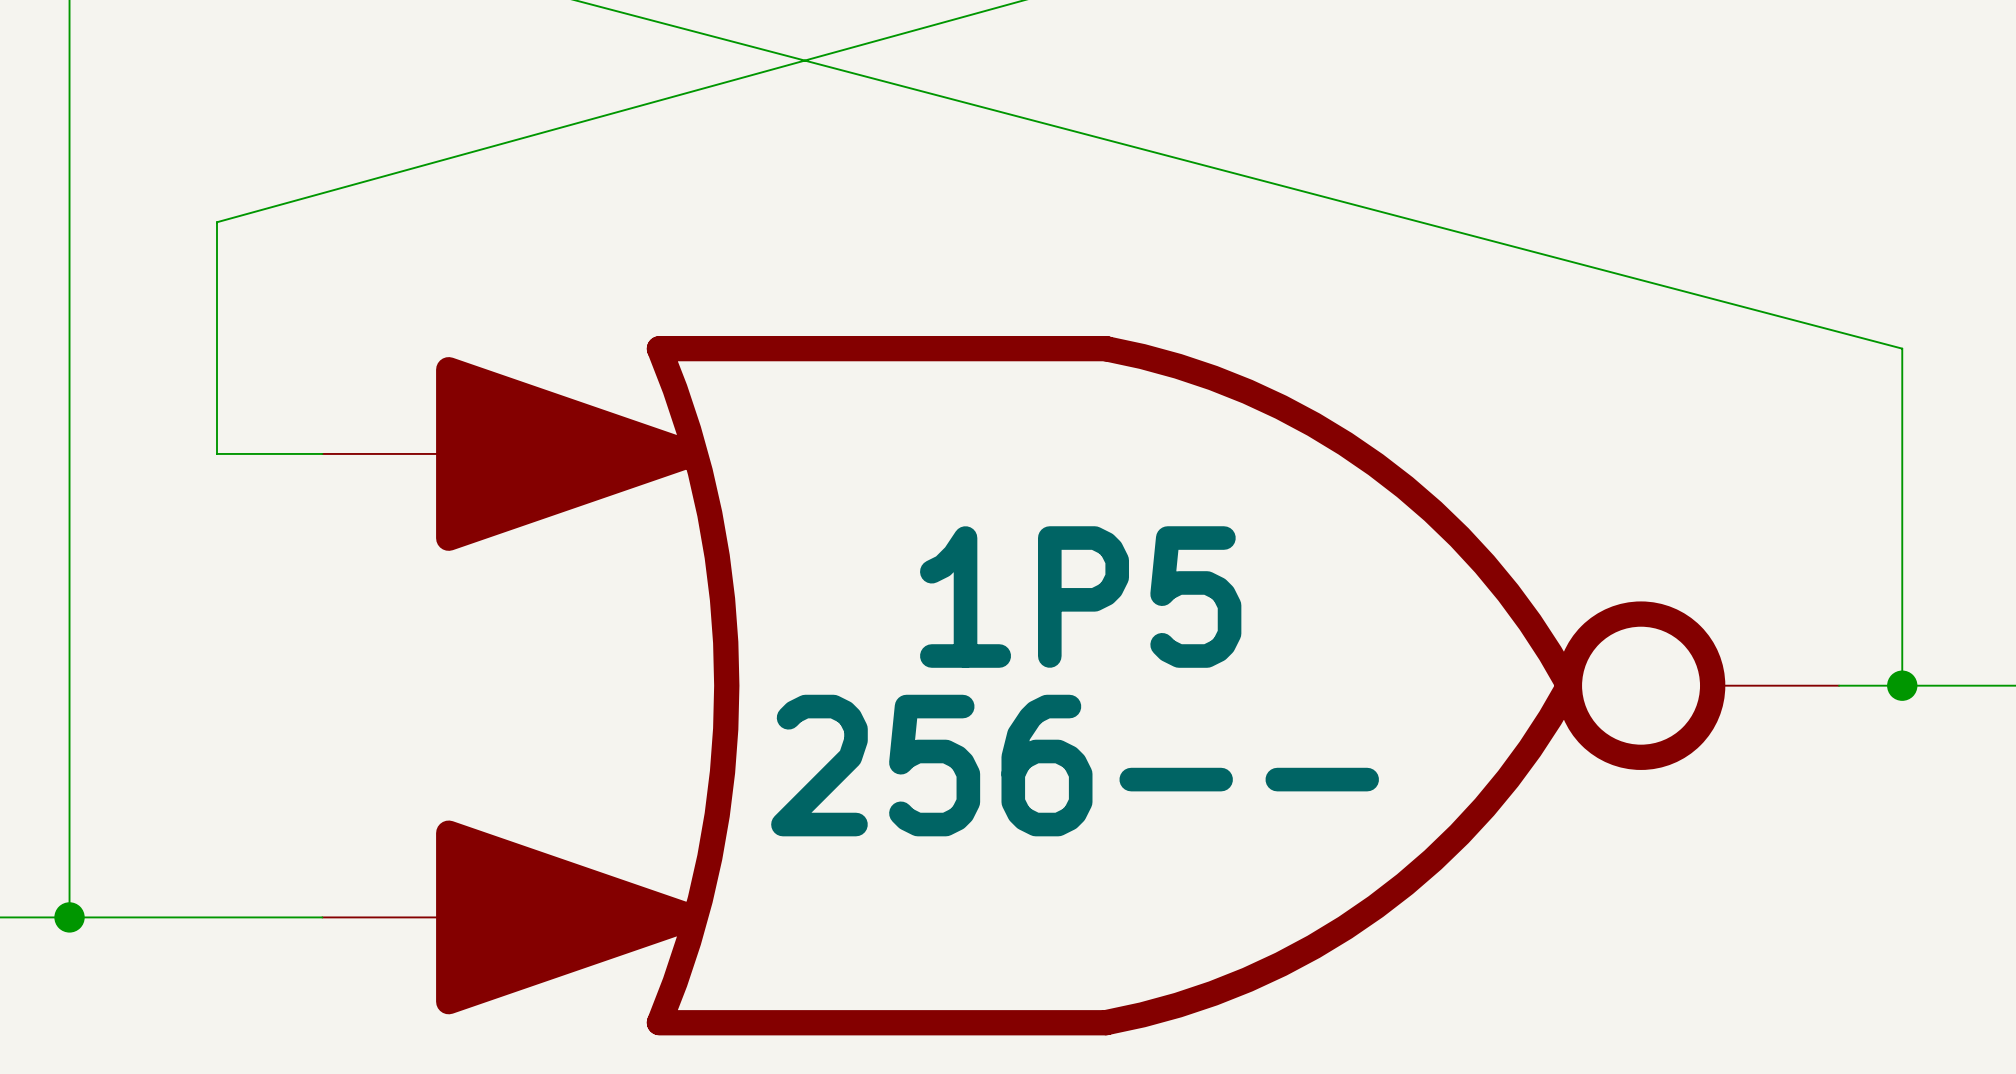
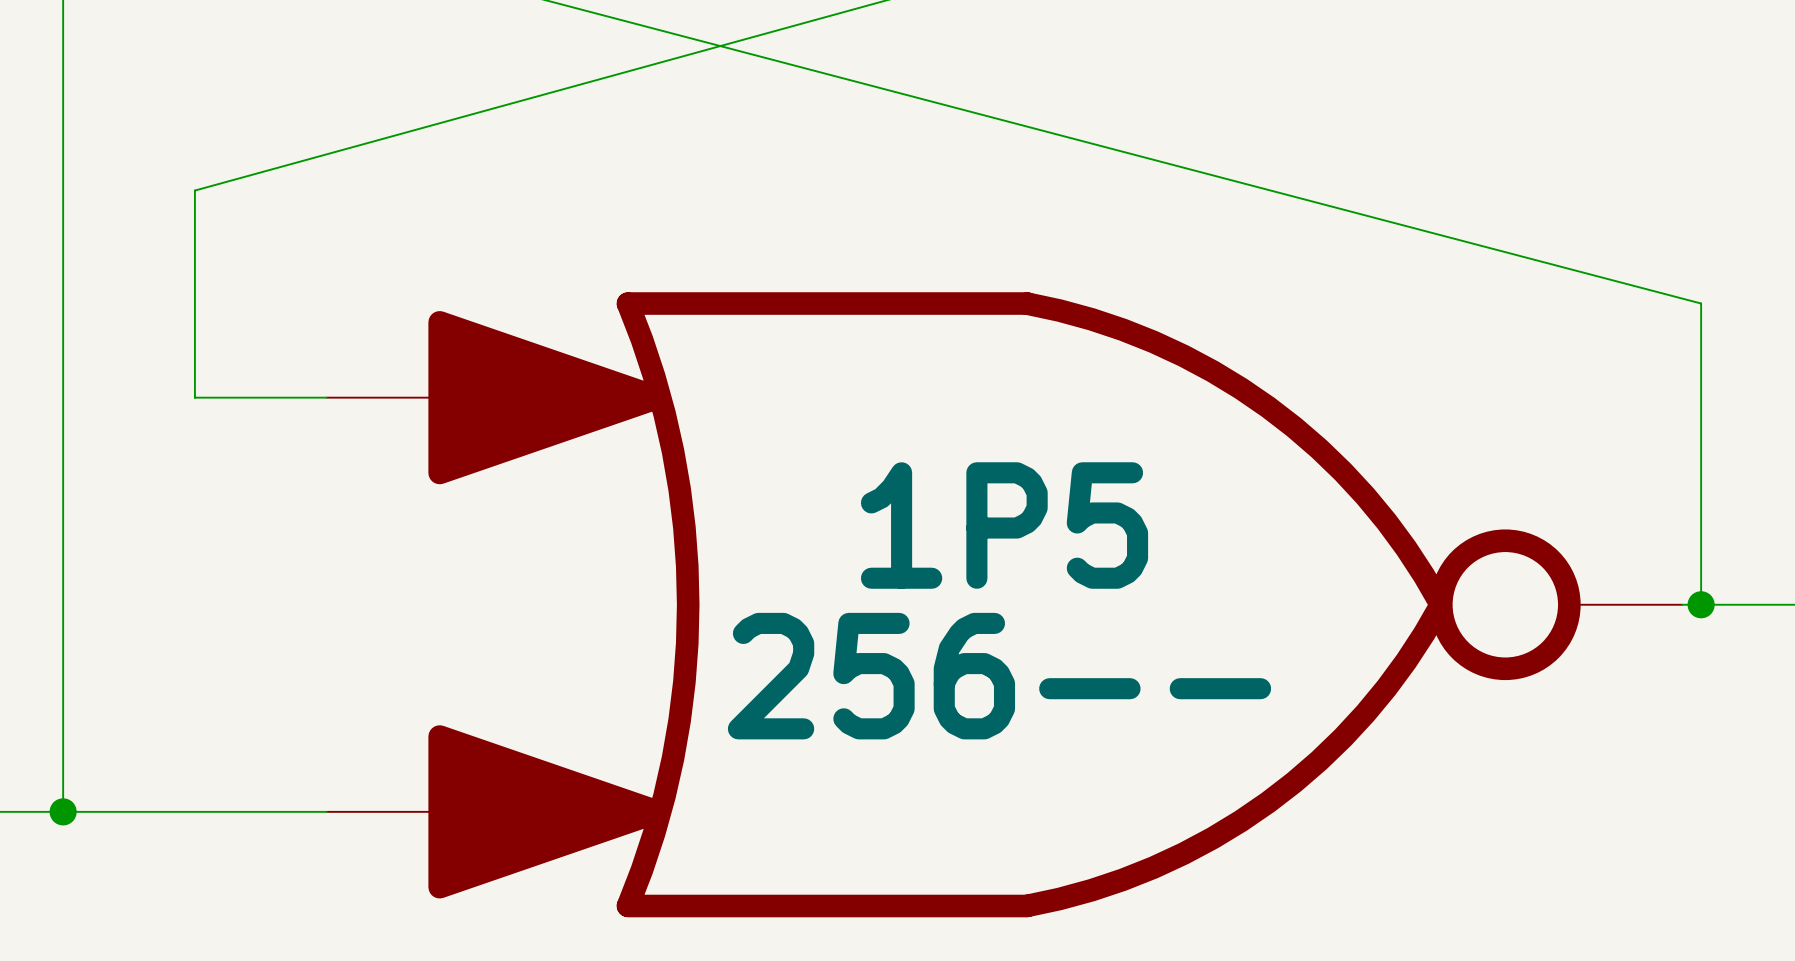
part position: (1080, 685) -> (1004, 604)

